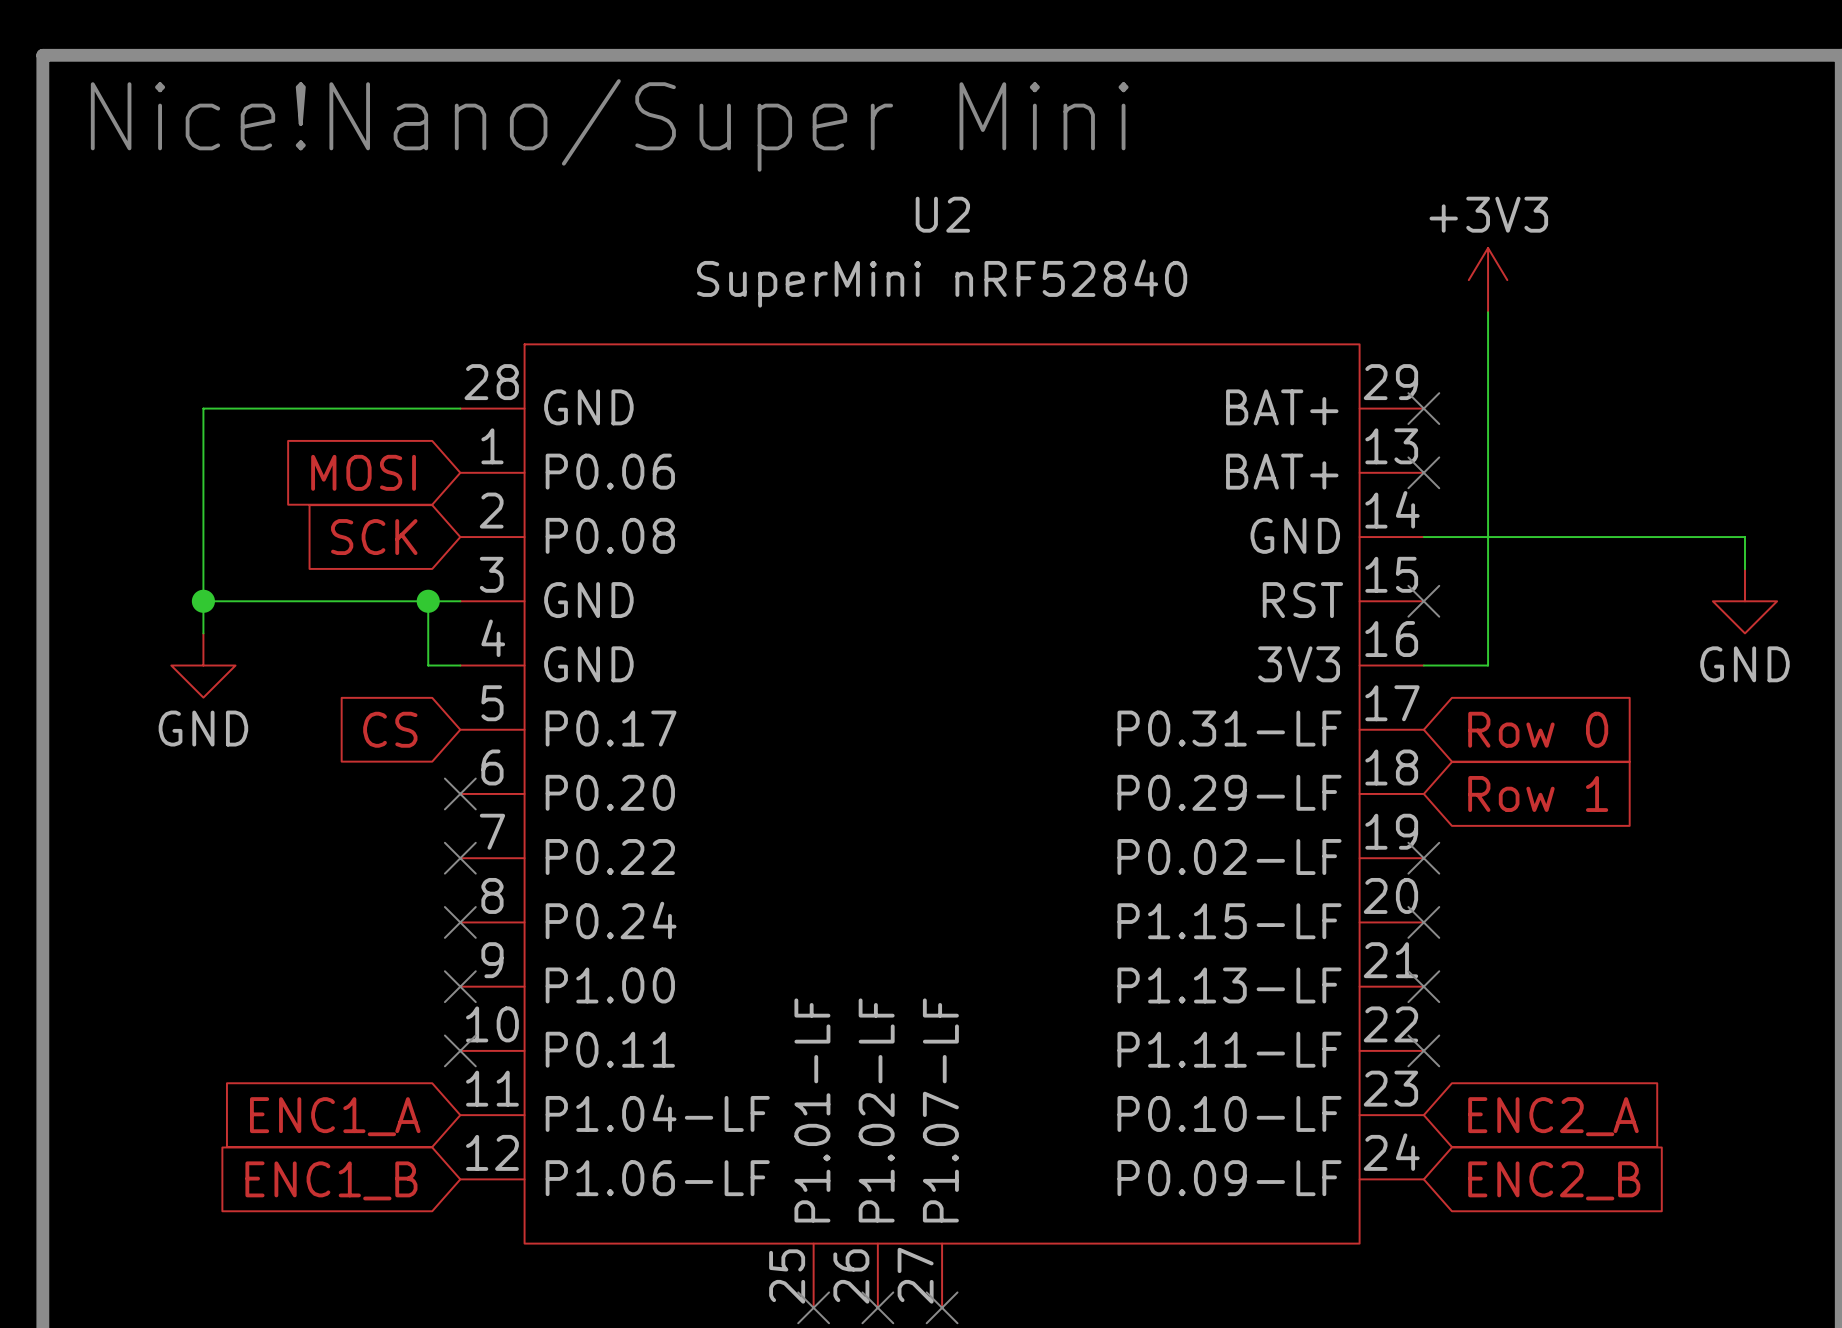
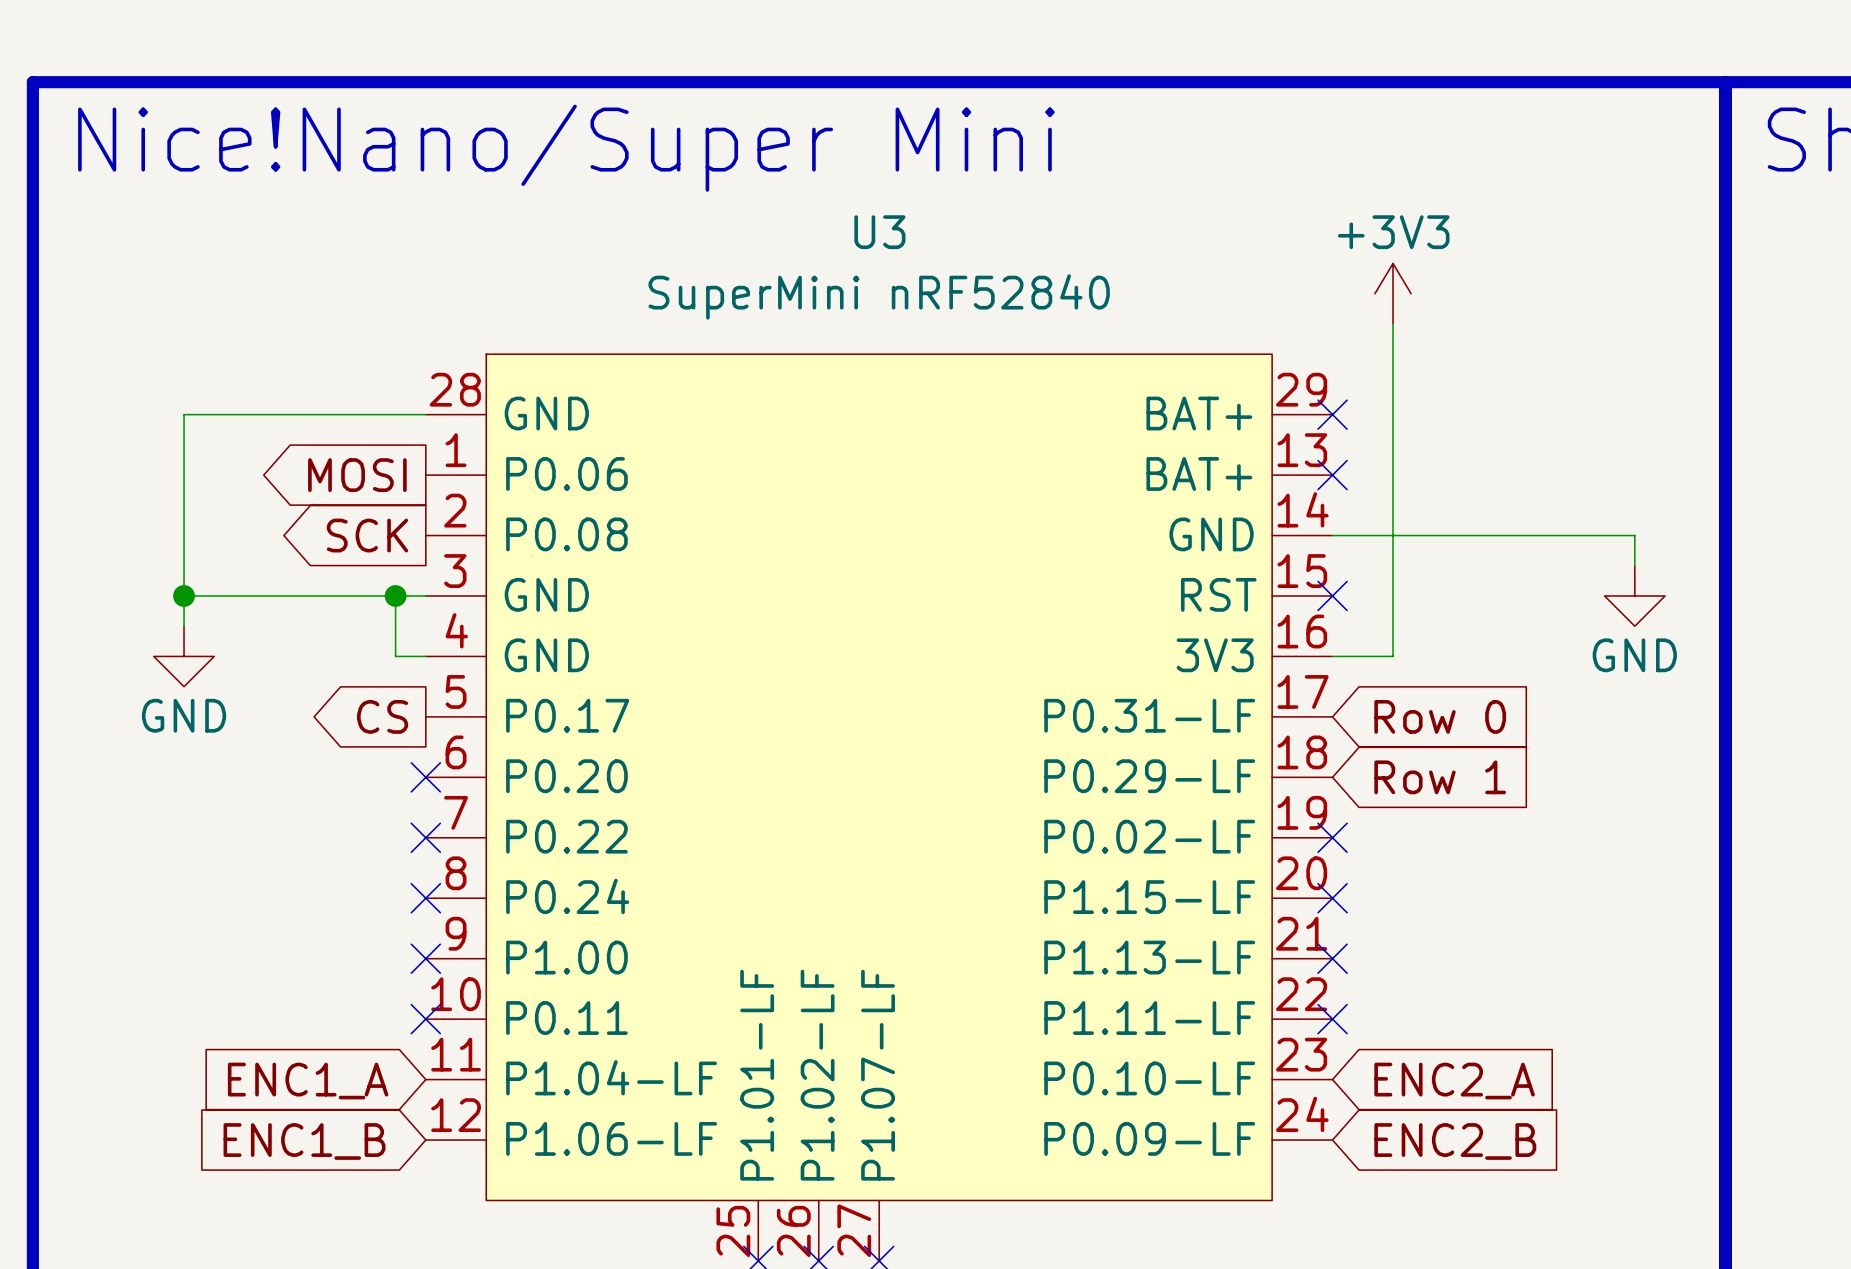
U2 name: U2 (942, 214) -> U3 (879, 232)
global label shape: input (363, 472) -> output (357, 475)
global label shape: input (374, 537) -> output (367, 535)
global label shape: input (390, 729) -> output (382, 716)

